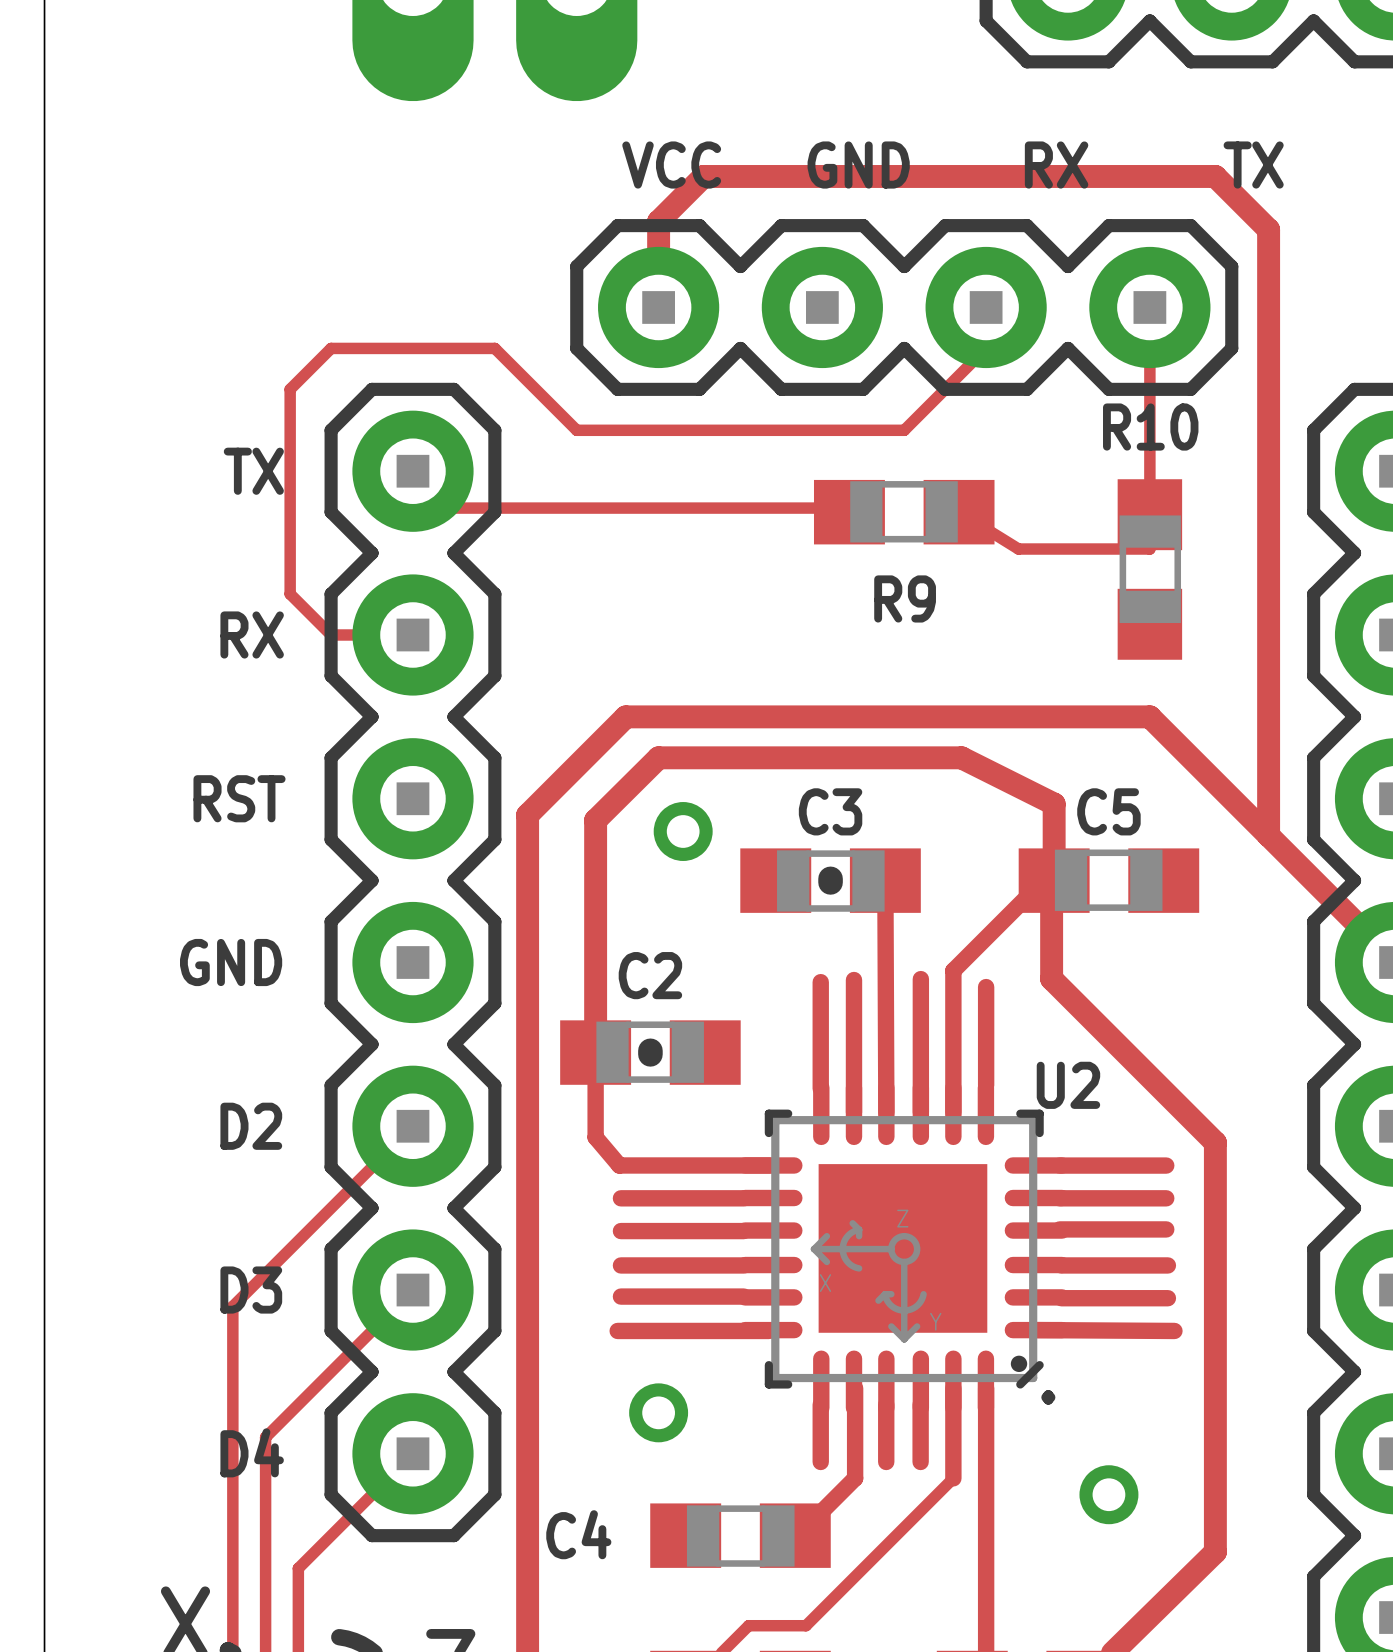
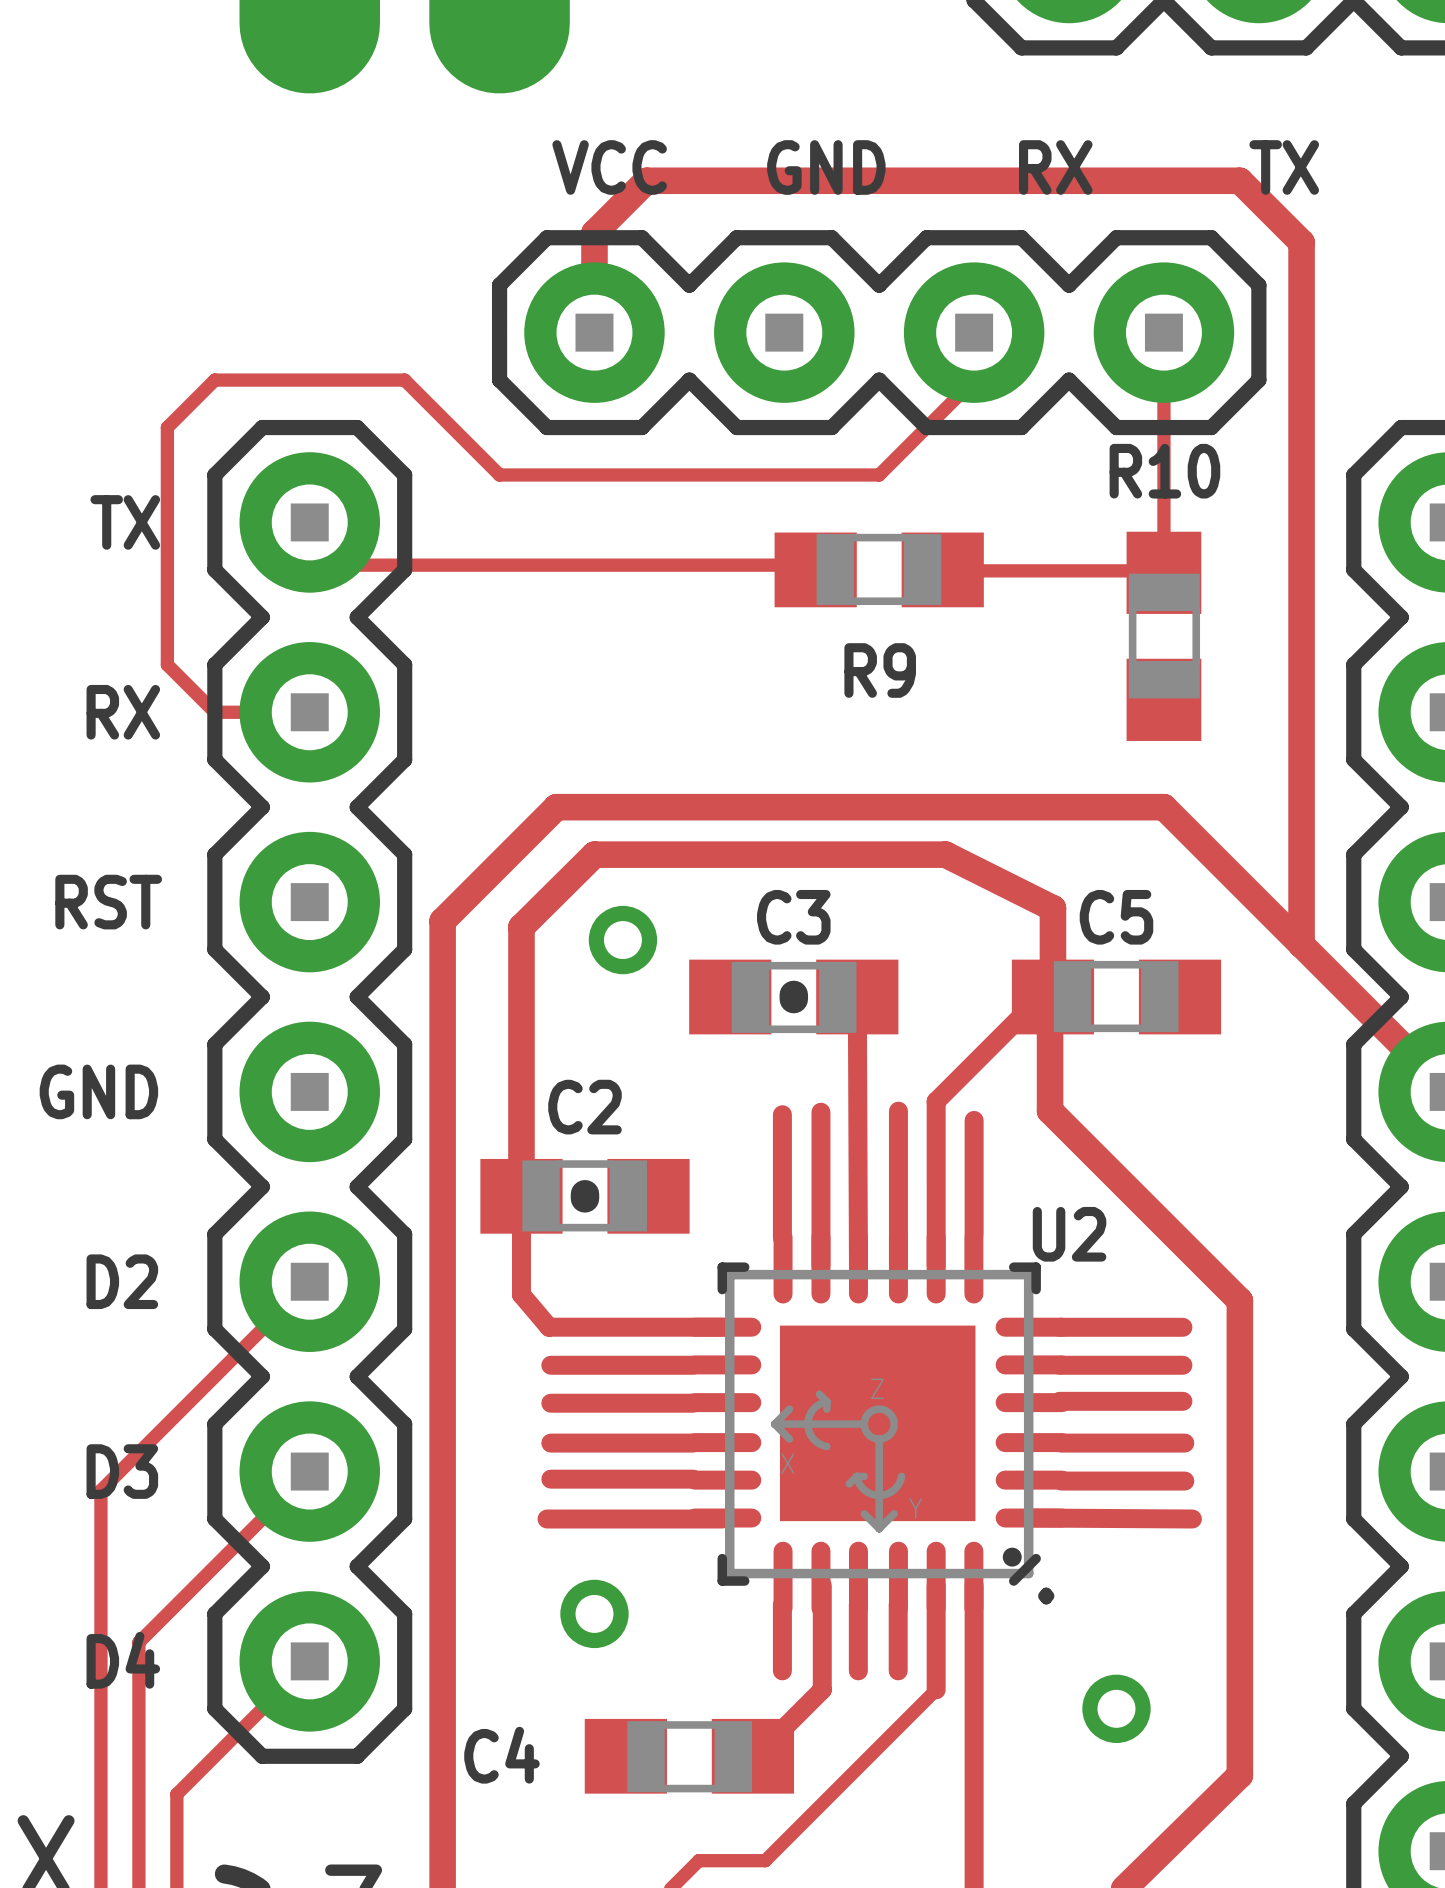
track: (960, 513) (1018, 549) (1149, 549) (1149, 514) -> (944, 570) (1161, 570) (1163, 572)

